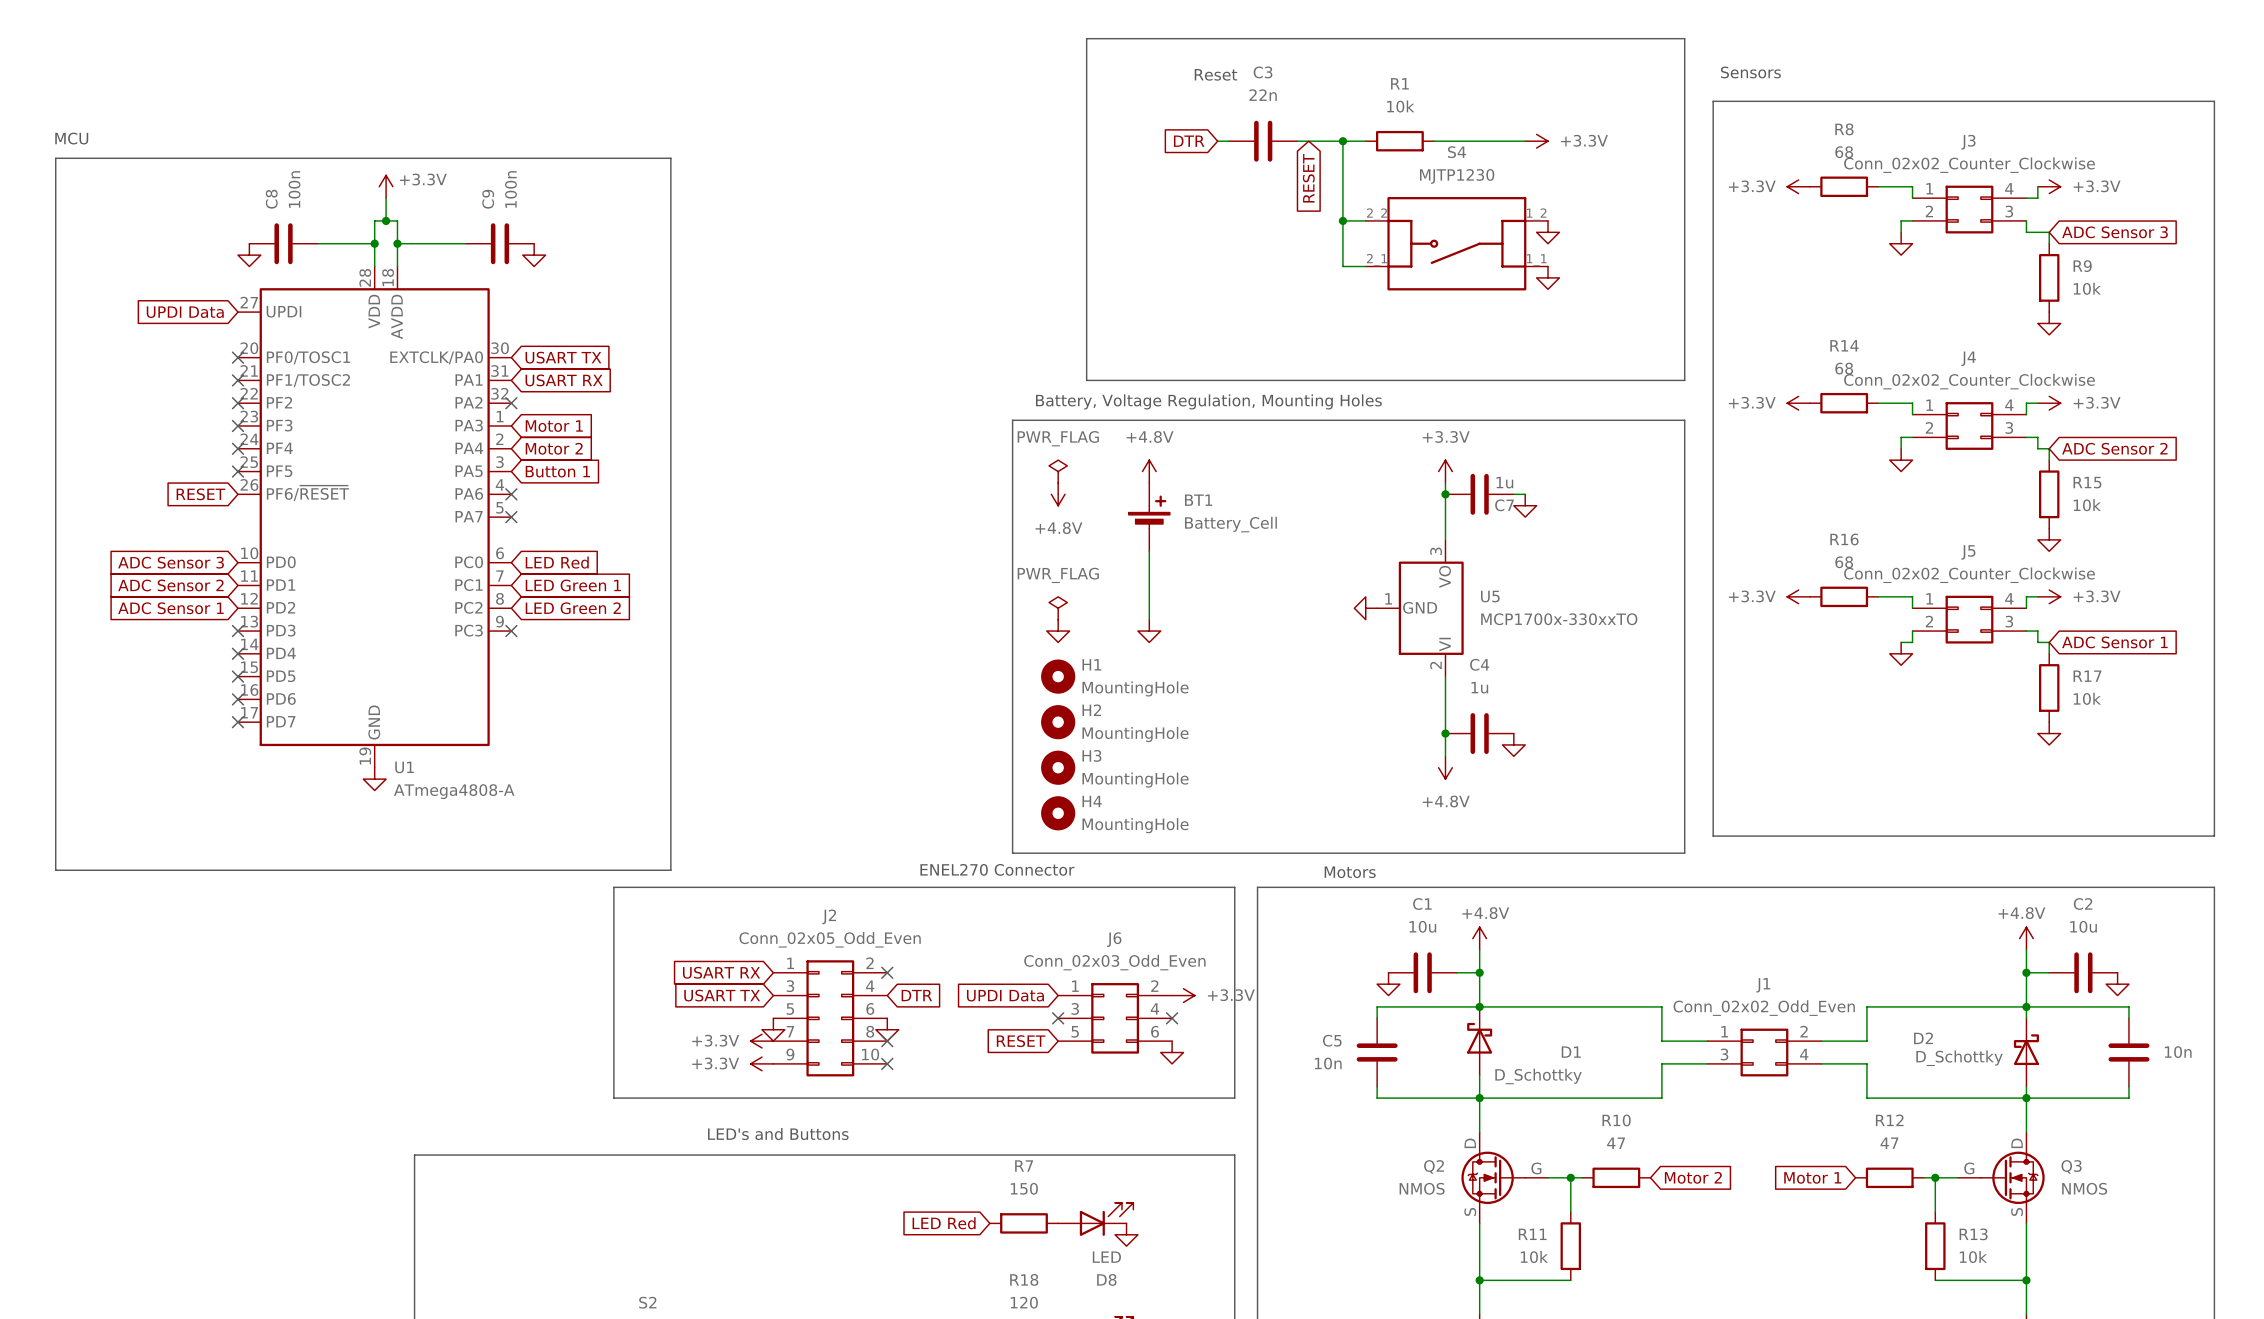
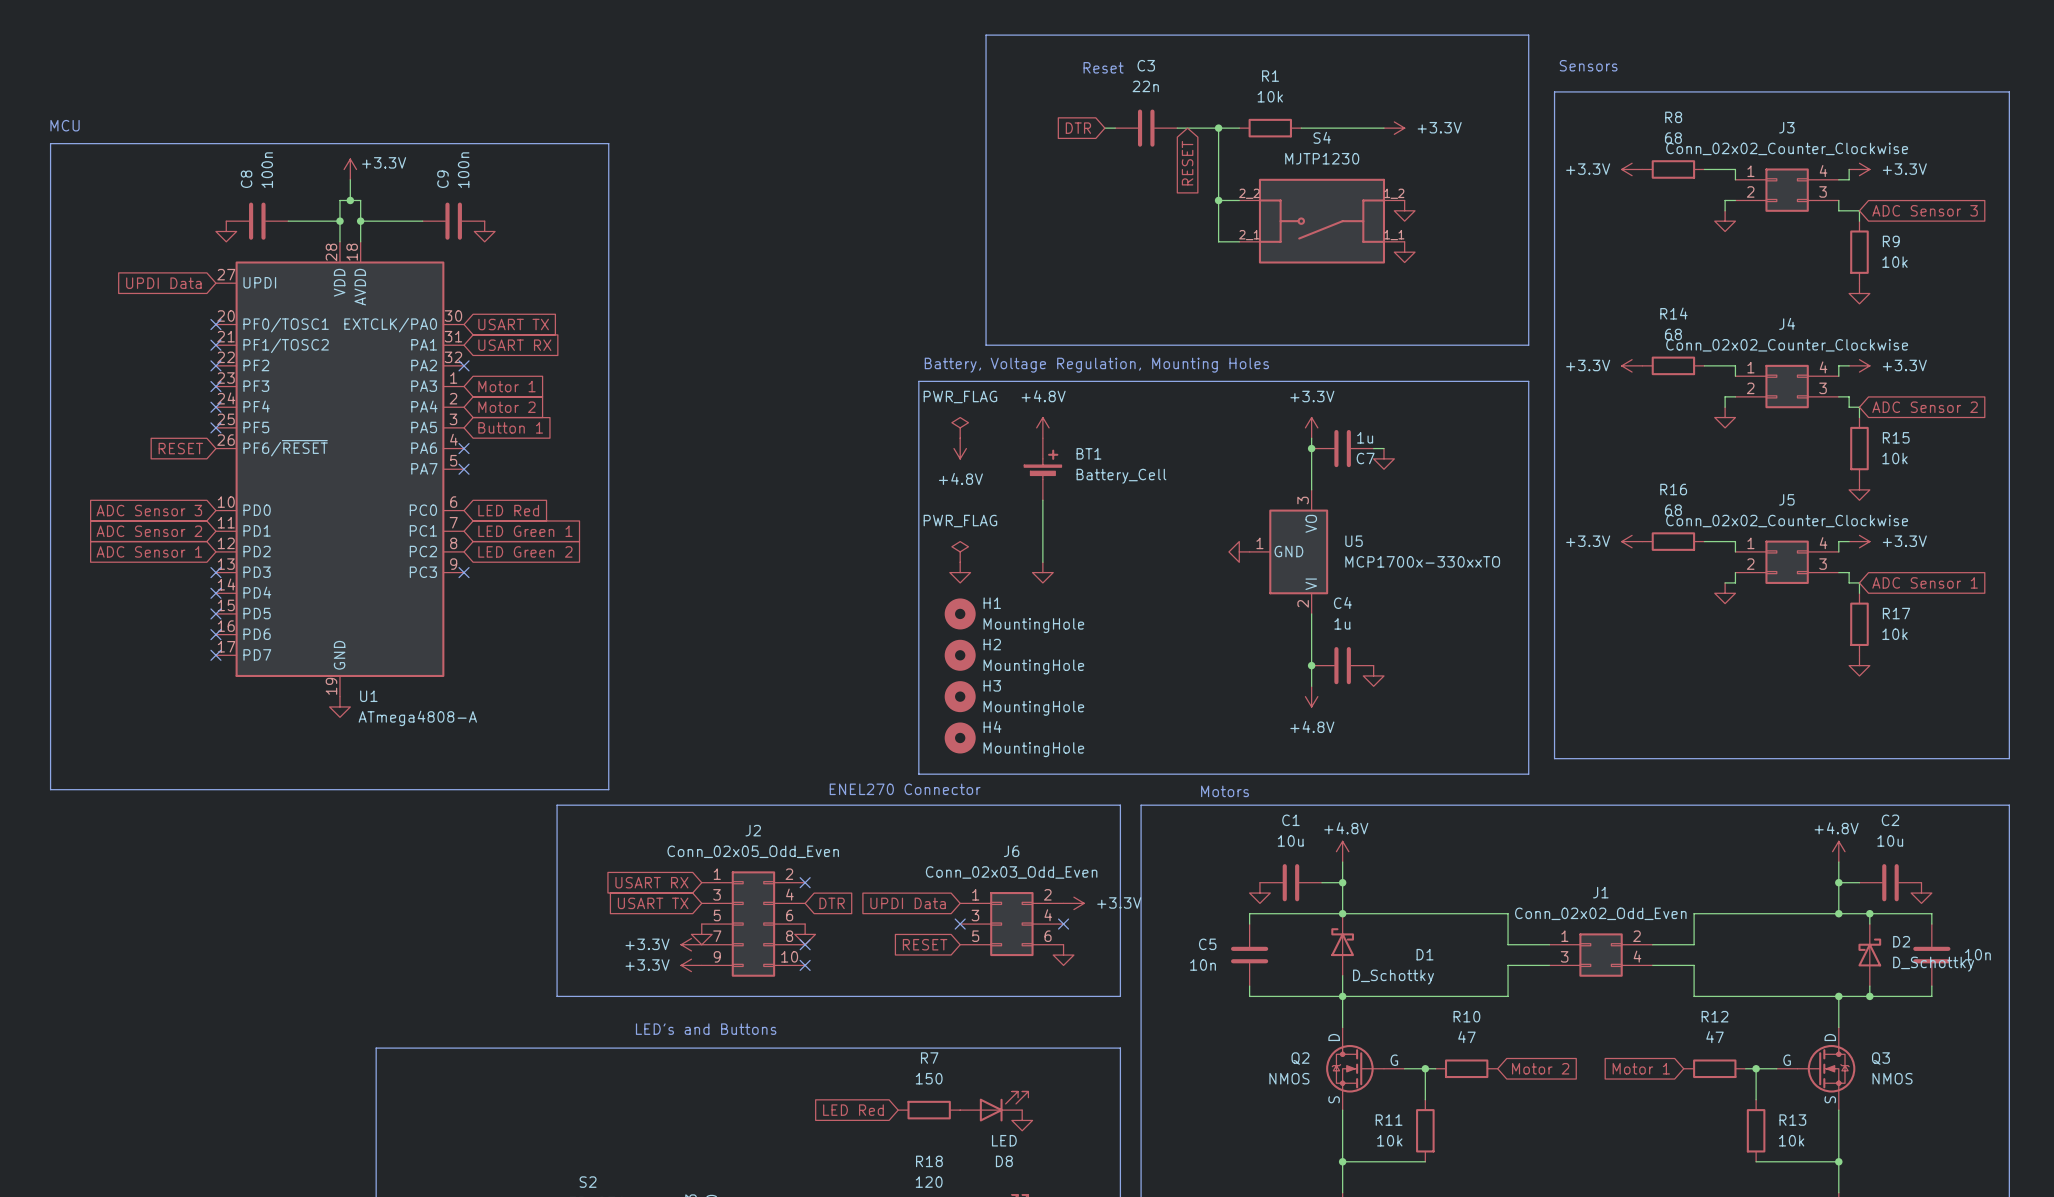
wire: (2026, 1006) (2026, 1018) -> (1869, 913) (1869, 924)
junction: none -> (1869, 913)
D2 name position: D2 (1923, 1038) -> D2 (1901, 941)
D2 position: (2026, 1052) -> (1869, 955)
D2 value position: D_Schottky (1959, 1058) -> D_Schottky (1933, 964)
wire: (2026, 1086) (2026, 1098) -> (1869, 986) (1869, 996)
junction: none -> (1869, 996)

